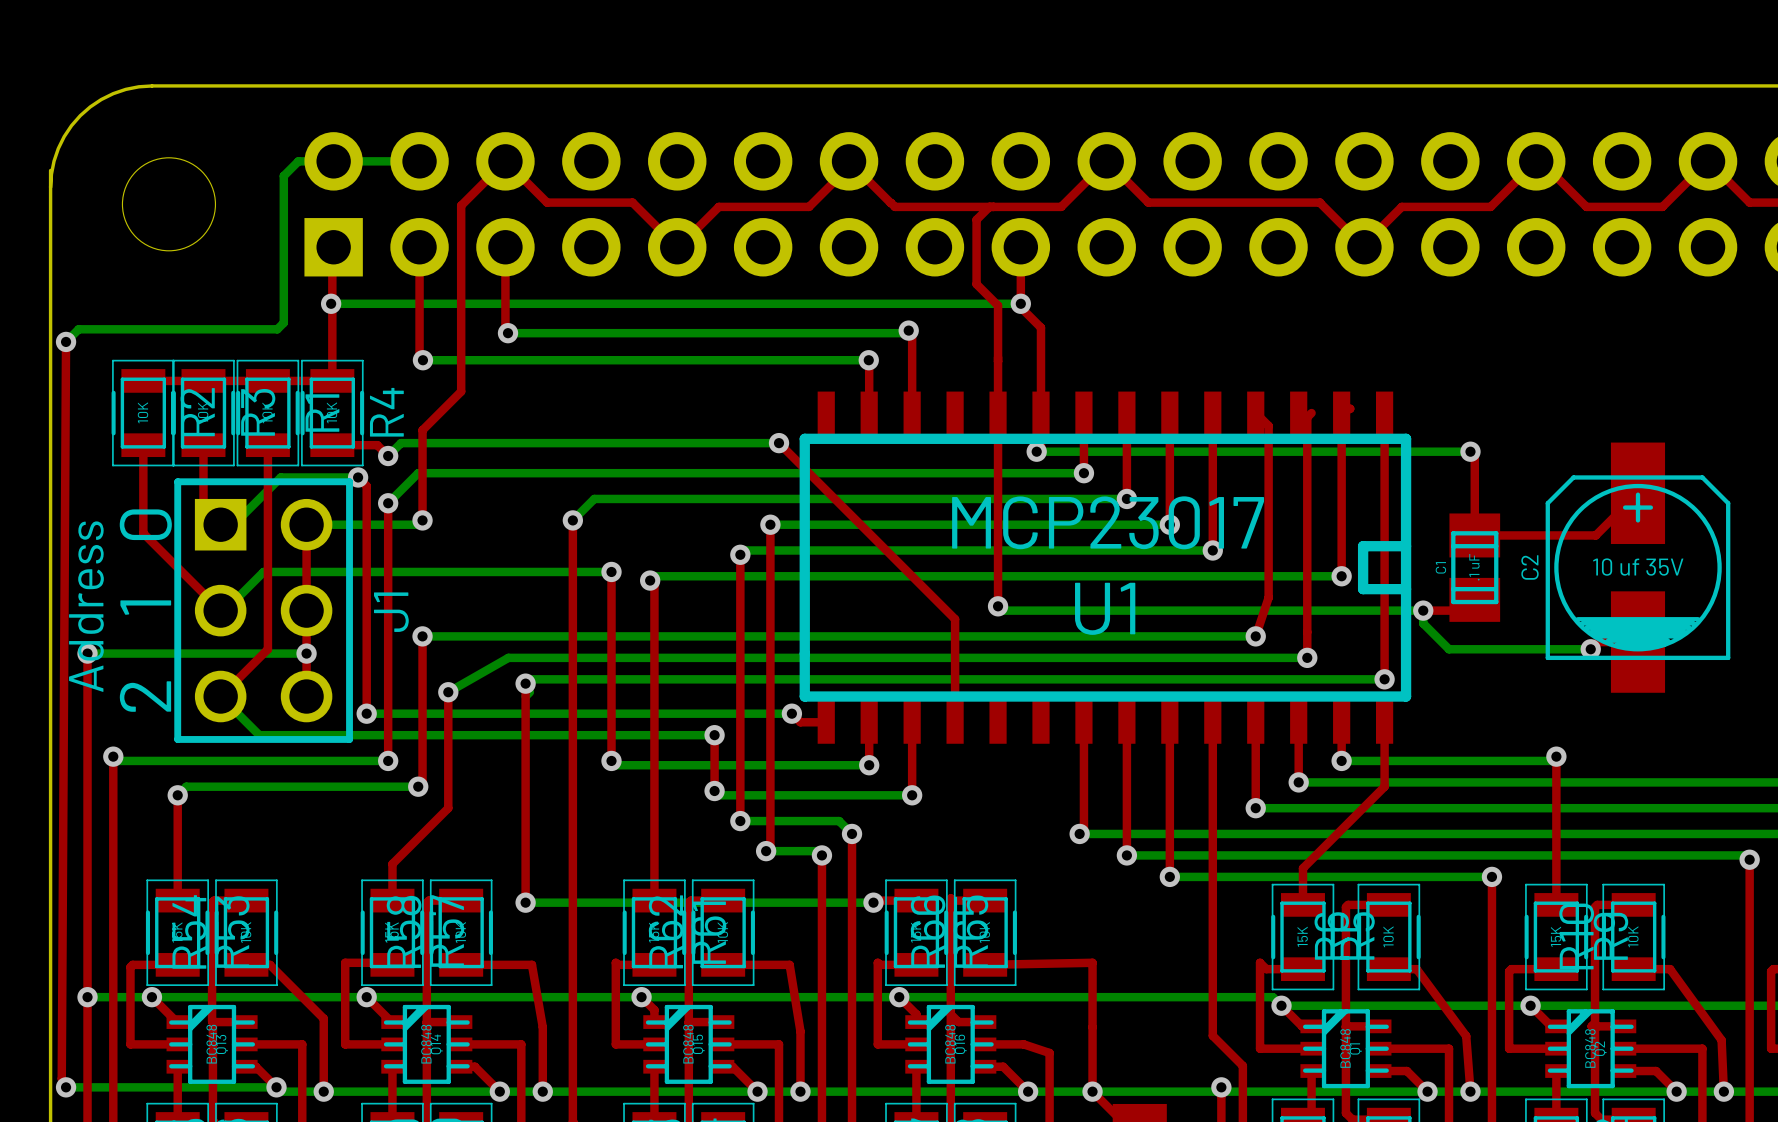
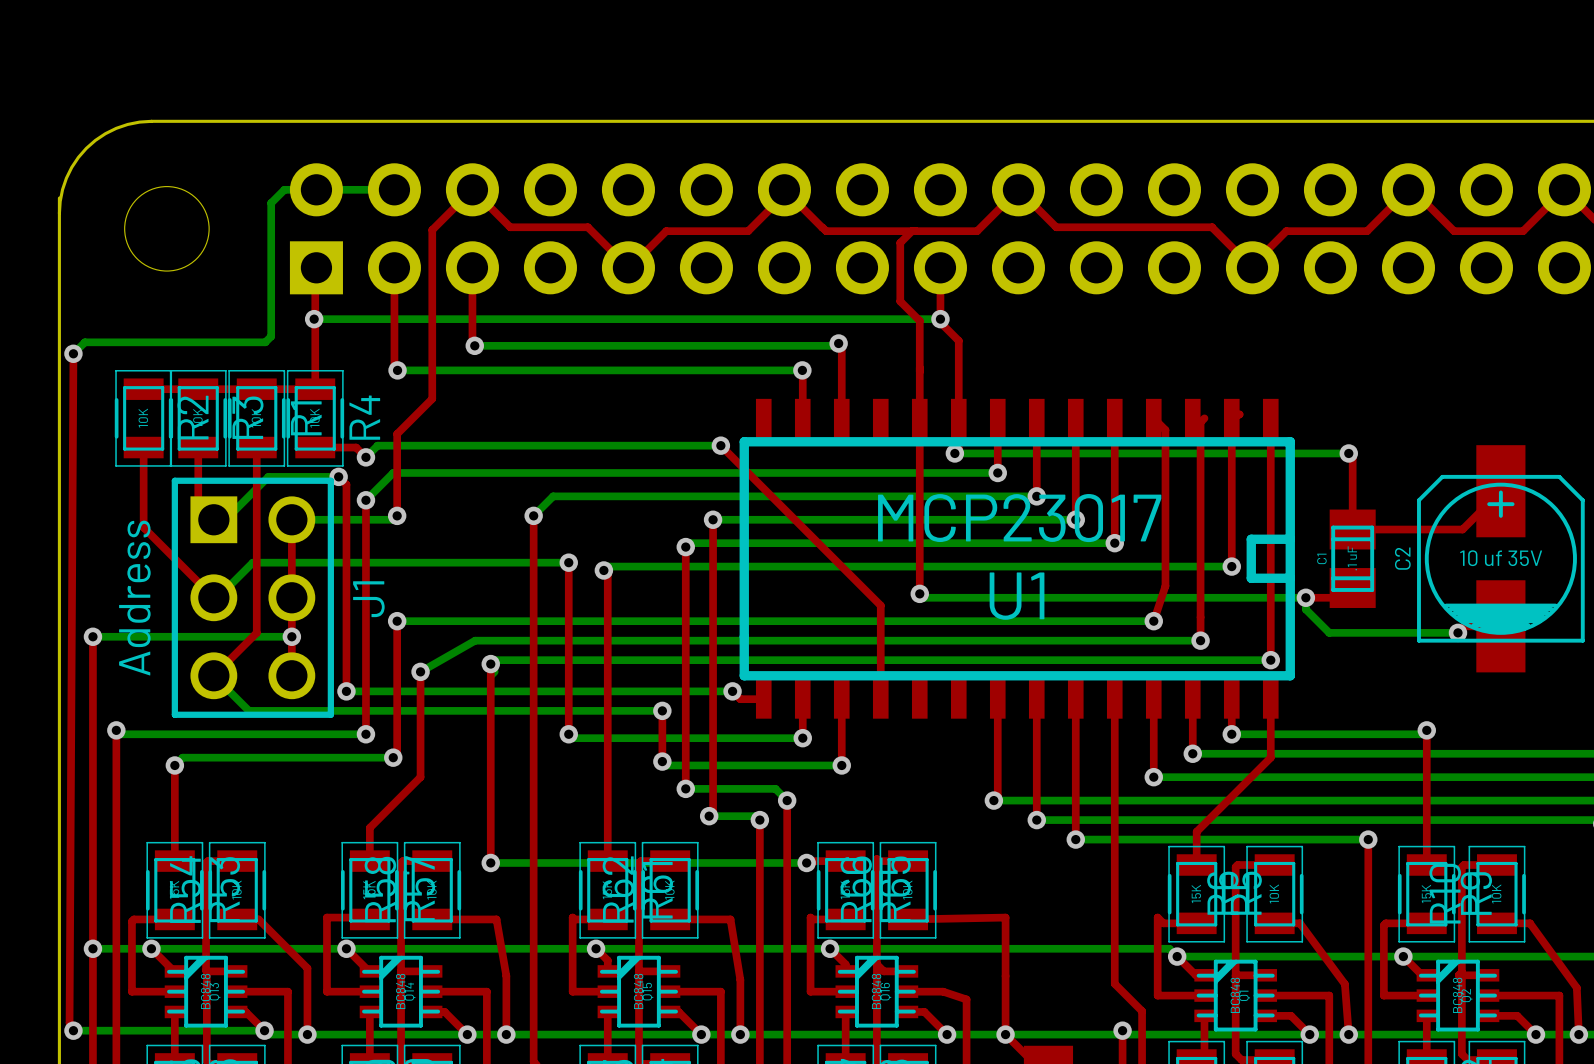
text: 0 (145, 524) -> none
J1 value position: Address (86, 606) -> Address (134, 598)
text: 1 (145, 607) -> none
text: 2 (145, 696) -> none

